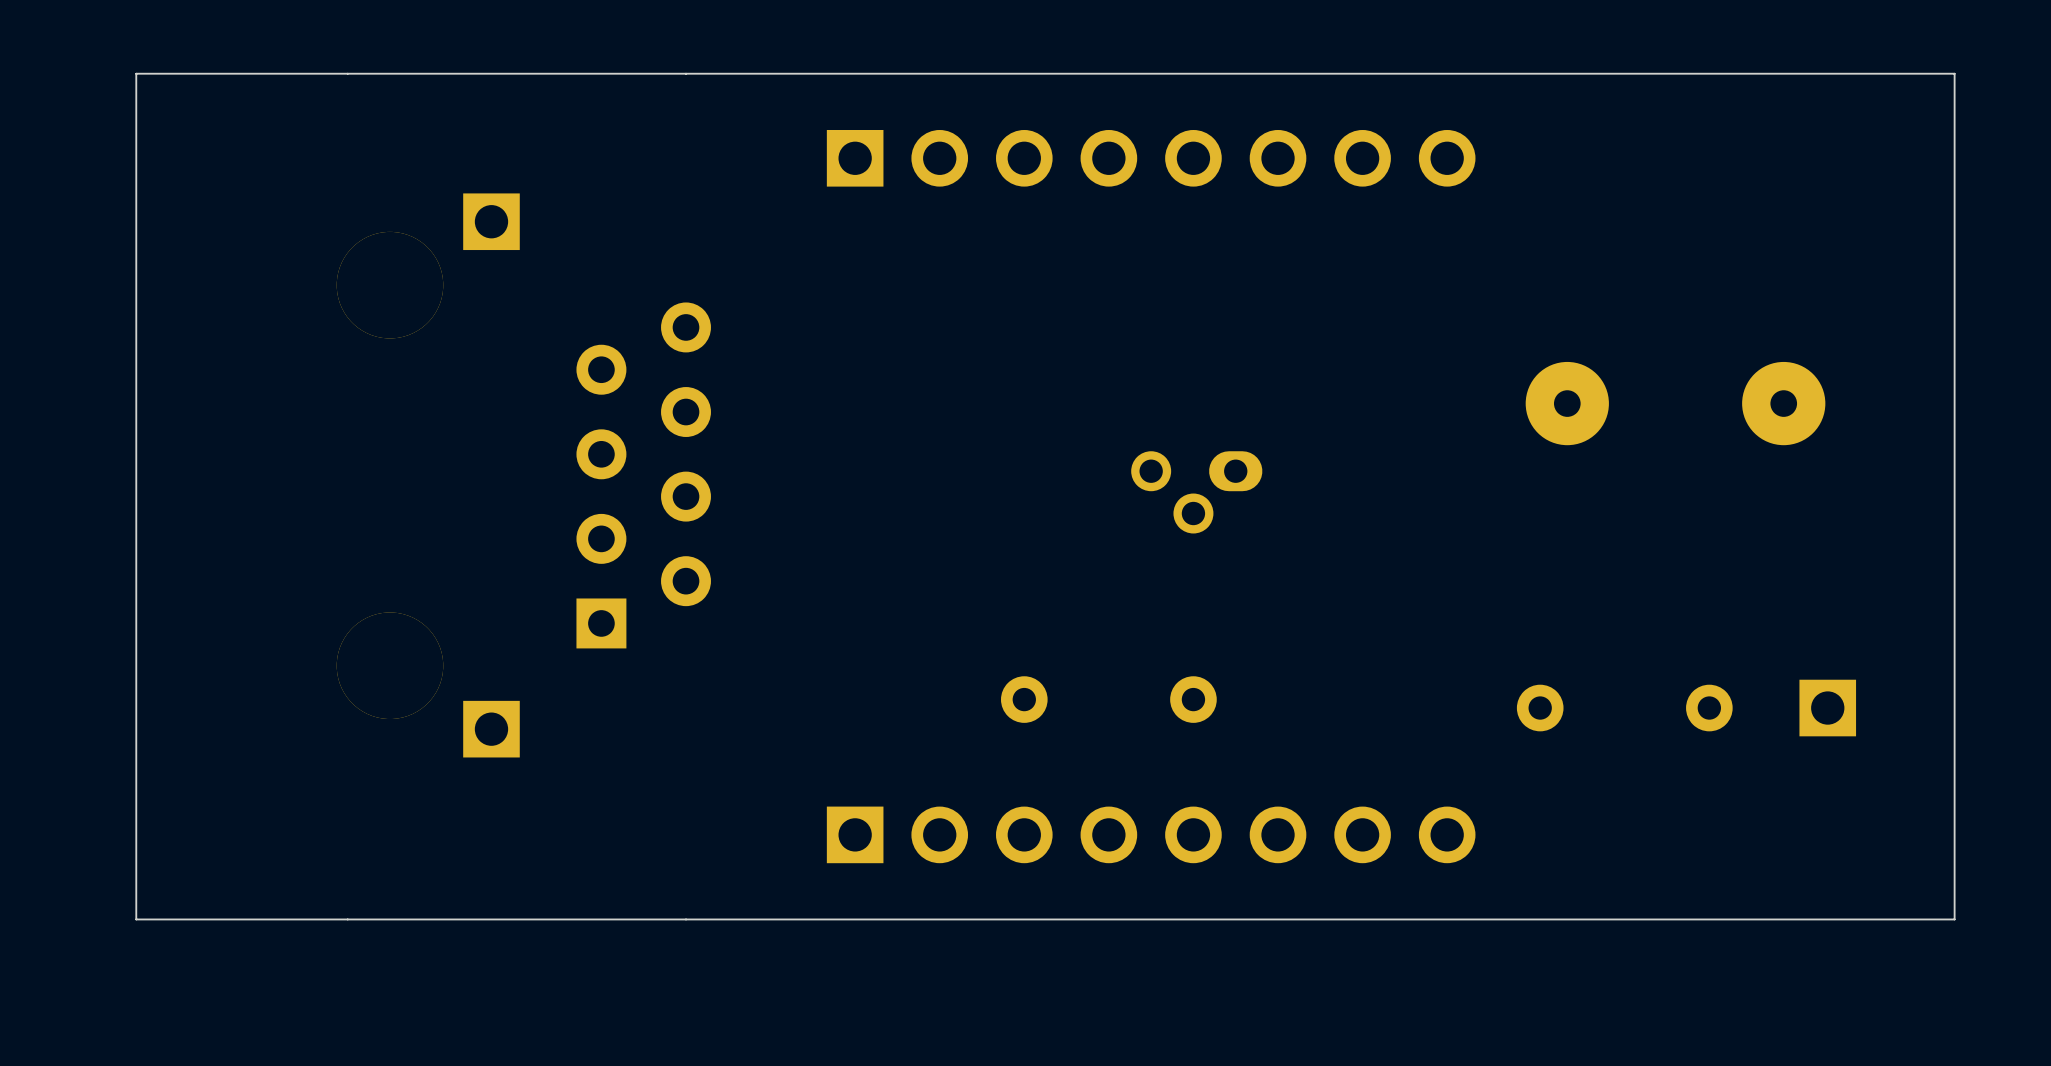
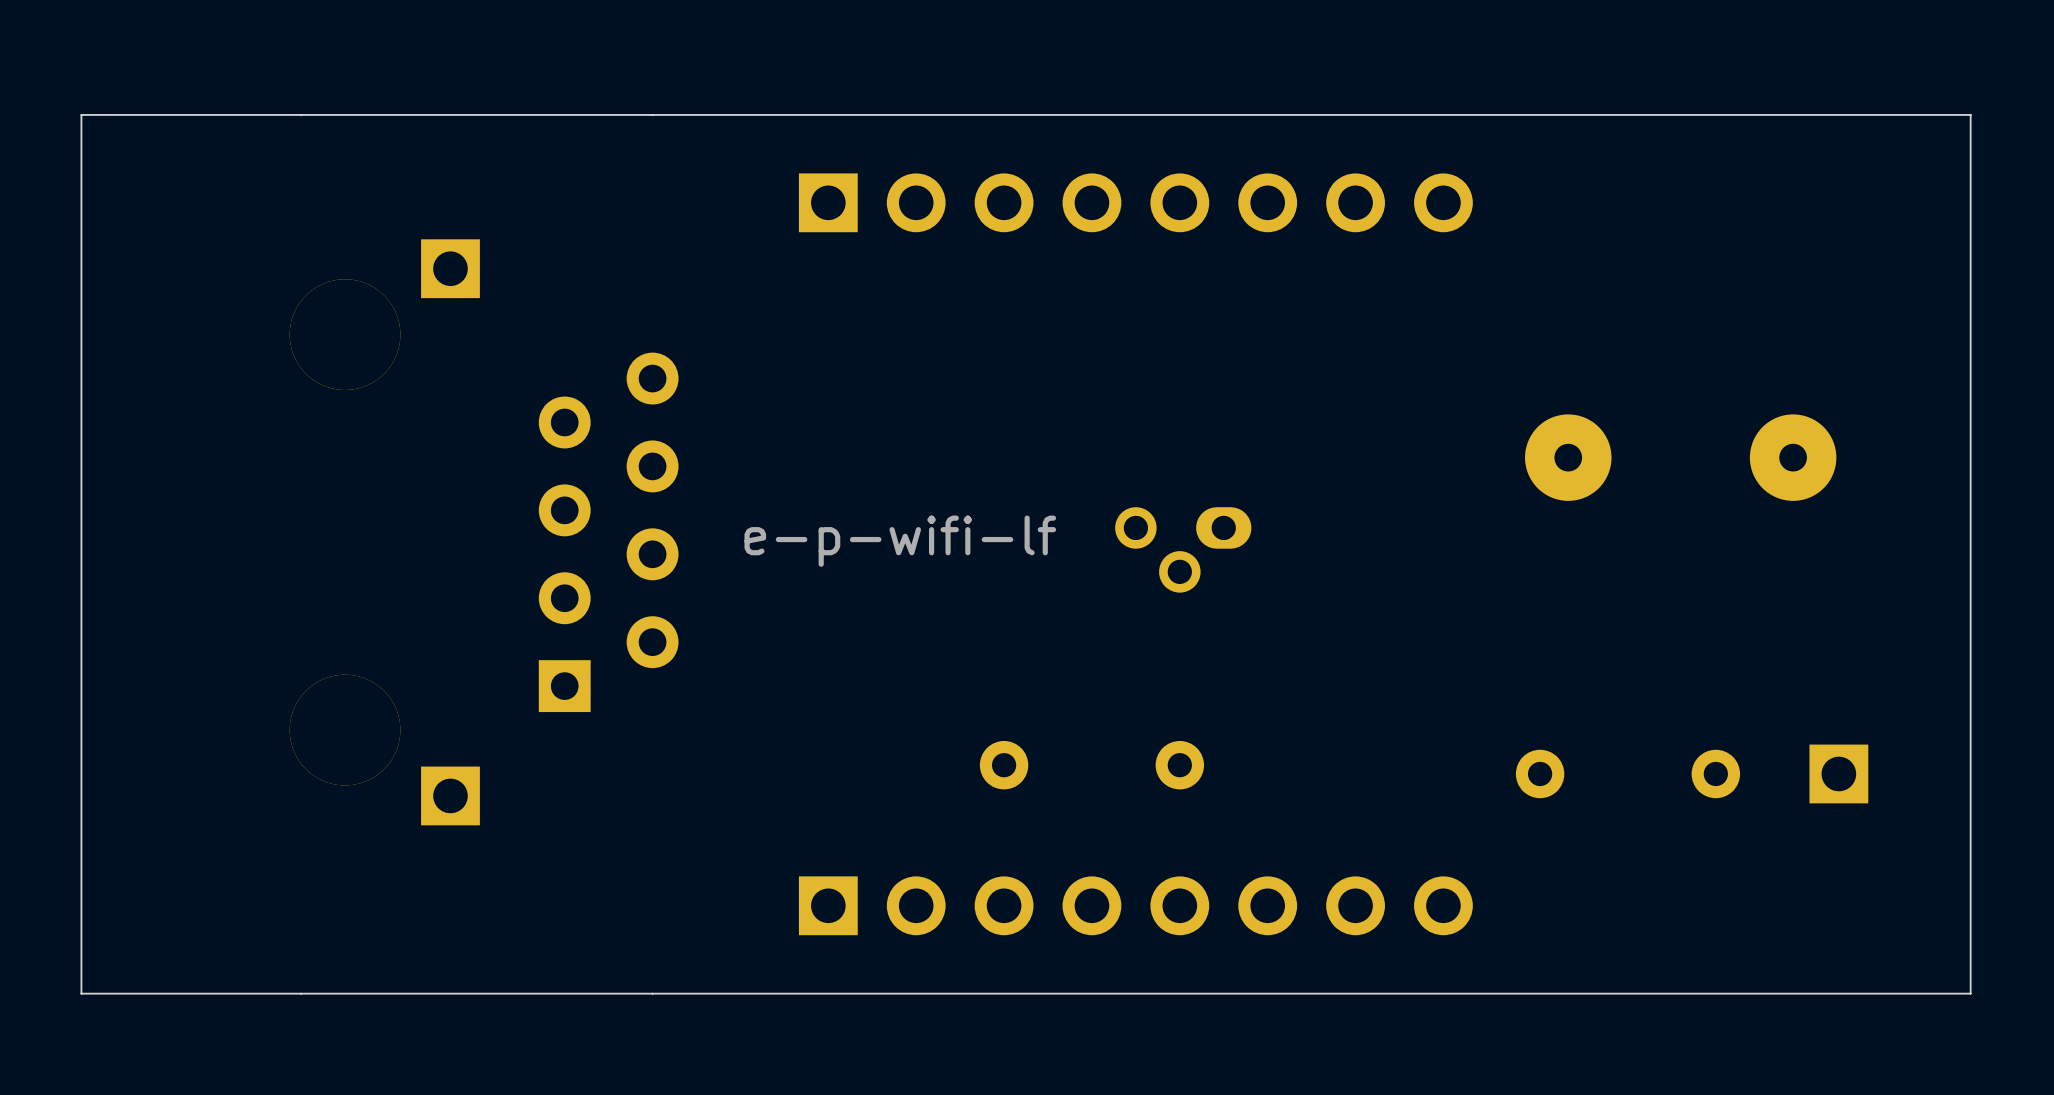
text: none -> e-p-wifi-lf (900, 541)

